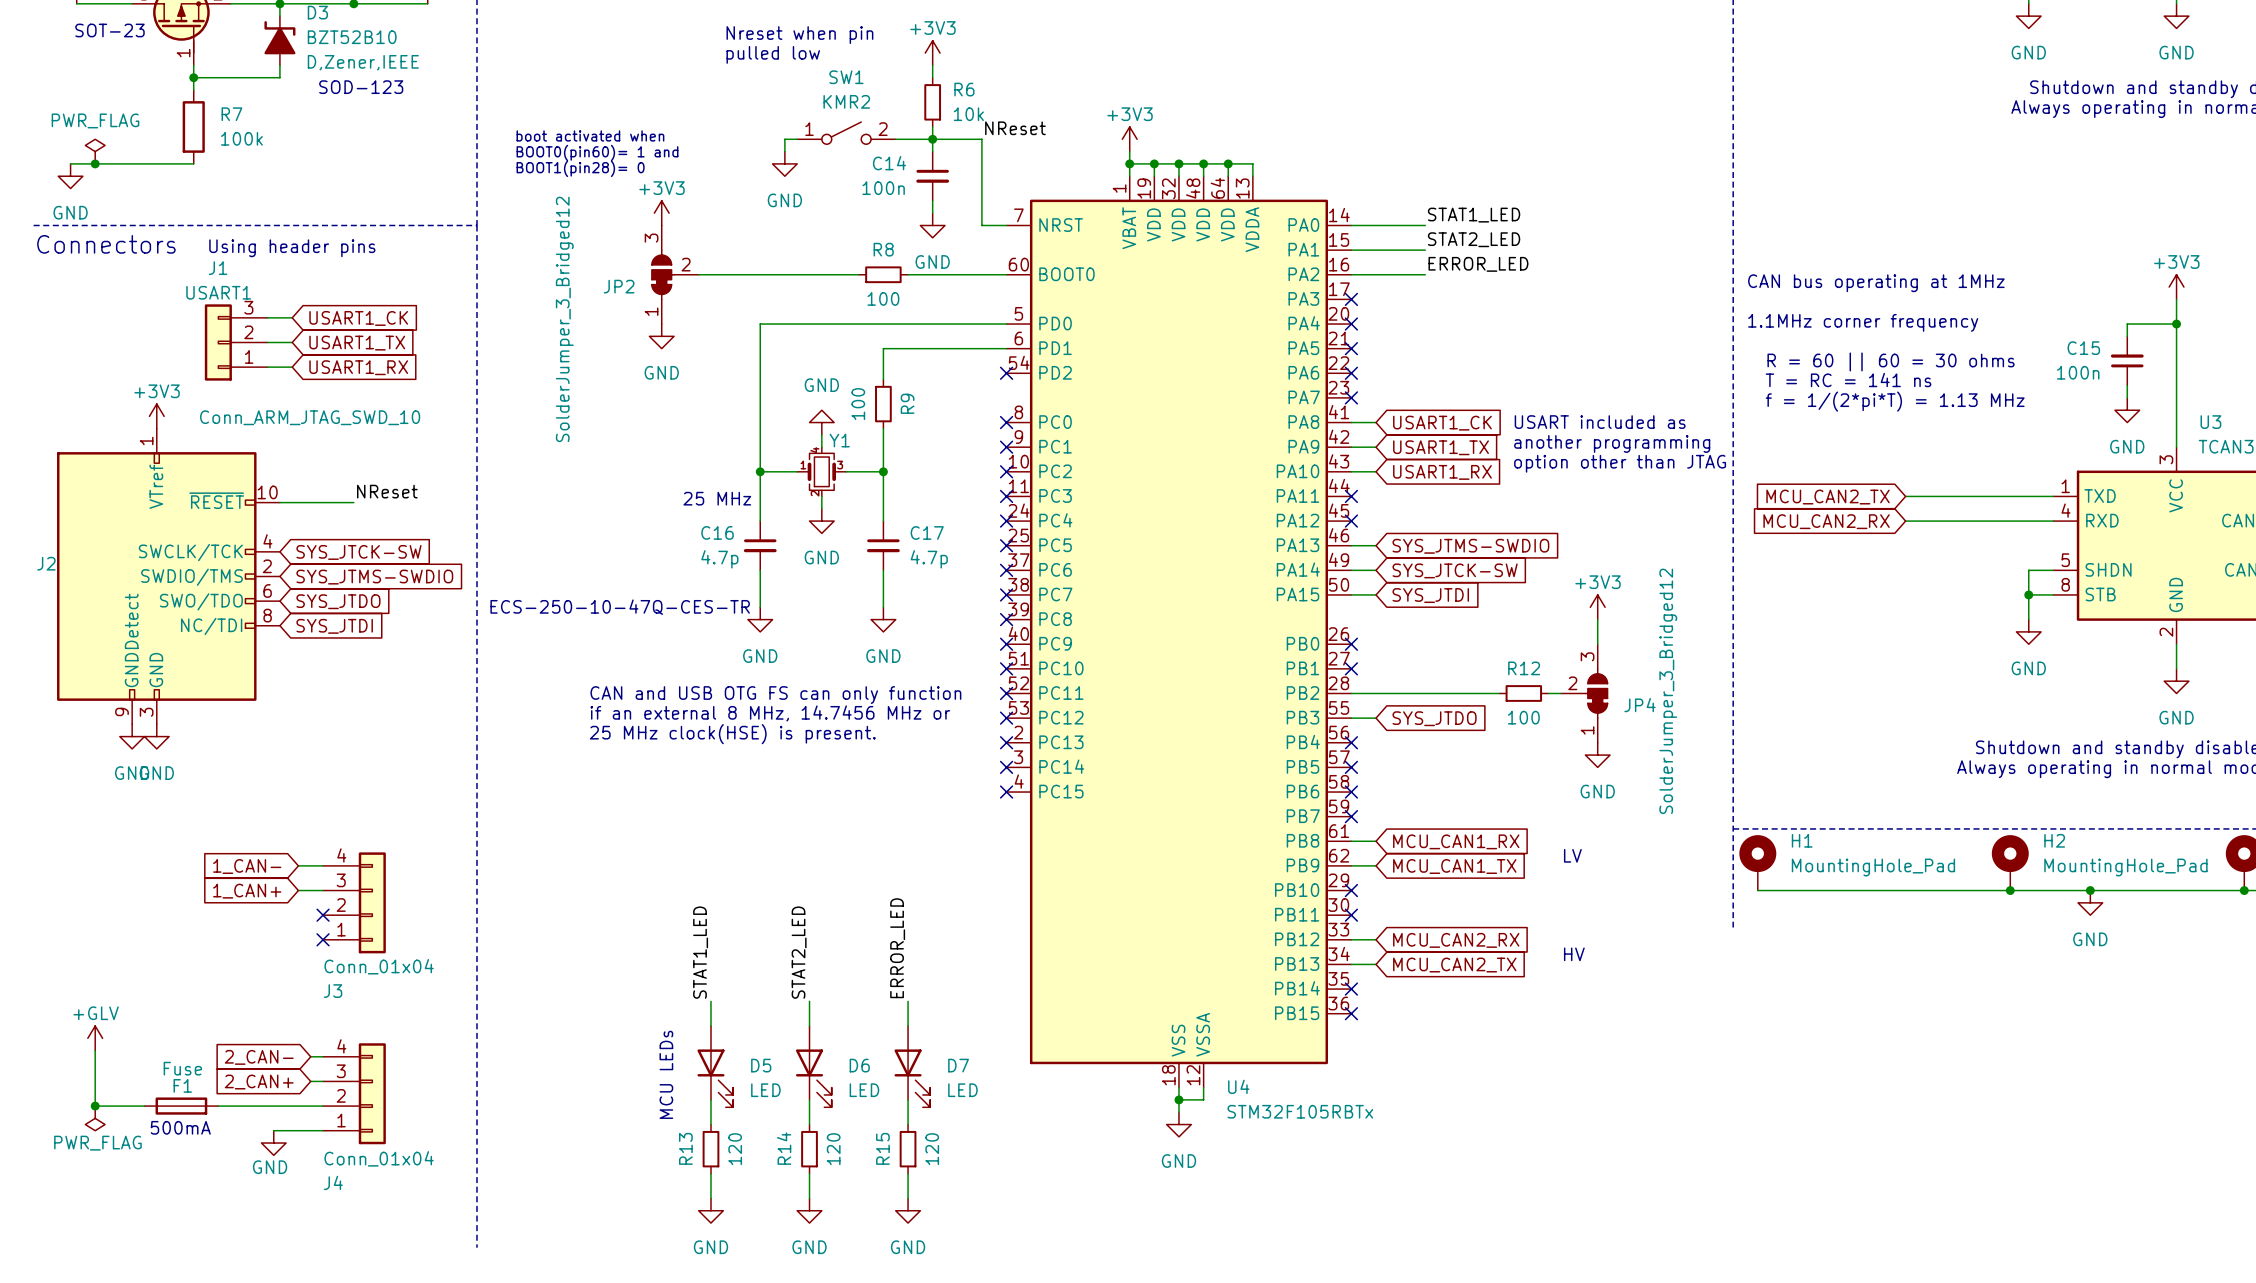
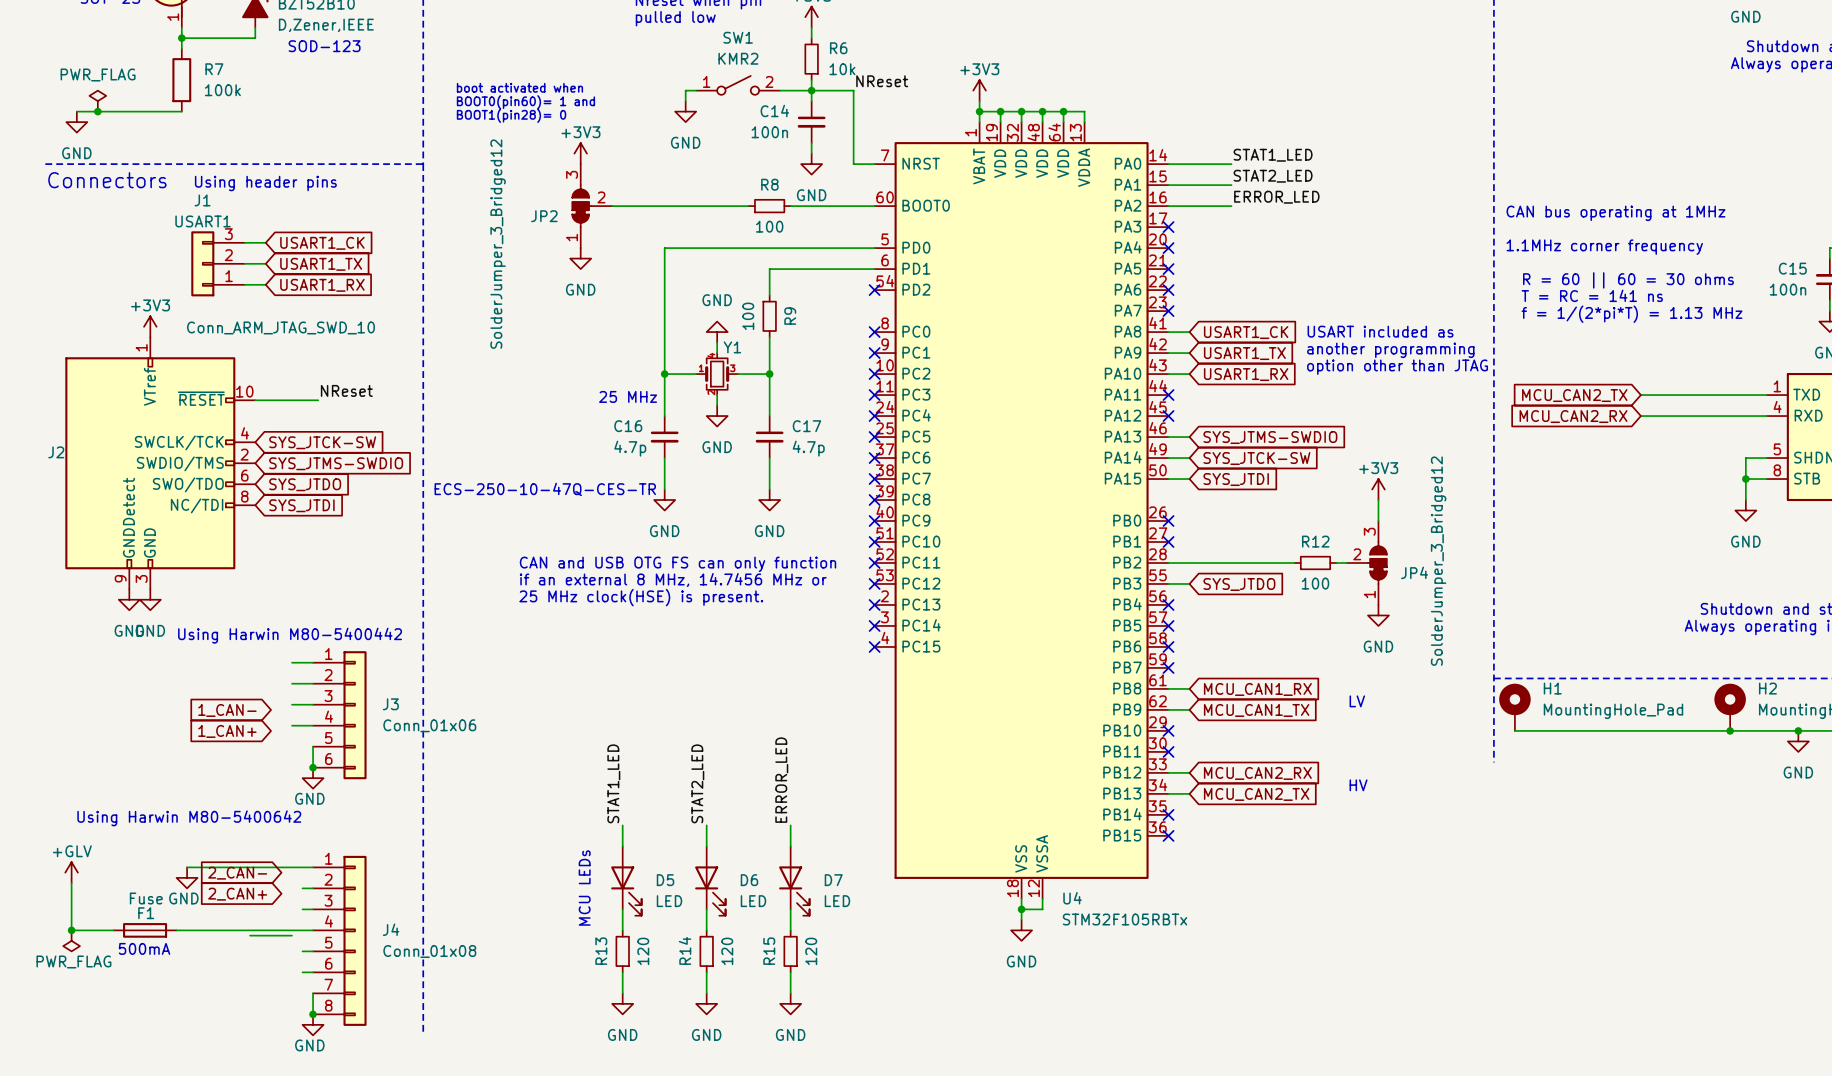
text: none -> Using Harwin M80-5400442 (290, 635)
wire: none -> (292, 662) (313, 662)
wire: none -> (292, 683) (313, 683)
J3 symbol: [323, 852, 386, 954] -> [313, 651, 367, 780]
wire: (298, 865) (323, 865) -> (292, 704) (313, 704)
wire: (298, 890) (323, 890) -> (292, 725) (313, 725)
wire: none -> (313, 746) (313, 767)
no-connect mark: (323, 915) -> none
junction: none -> (313, 767)
no-connect mark: (323, 939) -> none
power symbol: none -> GND (313, 778)
J3 value: Conn_01x04 (379, 966) -> Conn_01x06 (429, 725)
J3 name position: J3 (333, 991) -> J3 (390, 704)
text: none -> Using Harwin M80-5400642 (189, 818)
power symbol position: +GLV (95, 1038) -> +GLV (71, 872)
J4 symbol: [323, 1043, 386, 1145] -> [313, 855, 367, 1026]
wire: (95, 1050) (95, 1106) (144, 1106) -> (71, 883) (71, 930) (113, 930)
wire: none -> (187, 867) (313, 867)
wire: (310, 1056) (323, 1056) -> (302, 951) (313, 951)
power symbol: none -> GND (187, 877)
wire: (310, 1081) (323, 1081) -> (302, 888) (313, 888)
wire: none -> (302, 909) (313, 909)
junction position: (95, 1106) -> (71, 930)
F1 position: (181, 1106) -> (145, 930)
wire: (218, 1106) (323, 1106) -> none
power symbol position: PWR_FLAG (95, 1118) -> PWR_FLAG (71, 940)
wire: none -> (176, 930) (313, 930)
text position: 500mA (180, 1127) -> 500mA (144, 948)
power symbol: GND (273, 1143) -> none
J4 value: Conn_01x04 (379, 1158) -> Conn_01x08 (429, 951)
wire: none -> (302, 972) (313, 972)
J4 name position: J4 (333, 1182) -> J4 (391, 929)
wire: none -> (313, 993) (313, 1014)
junction: none -> (313, 1014)
power symbol: none -> GND (313, 1024)

